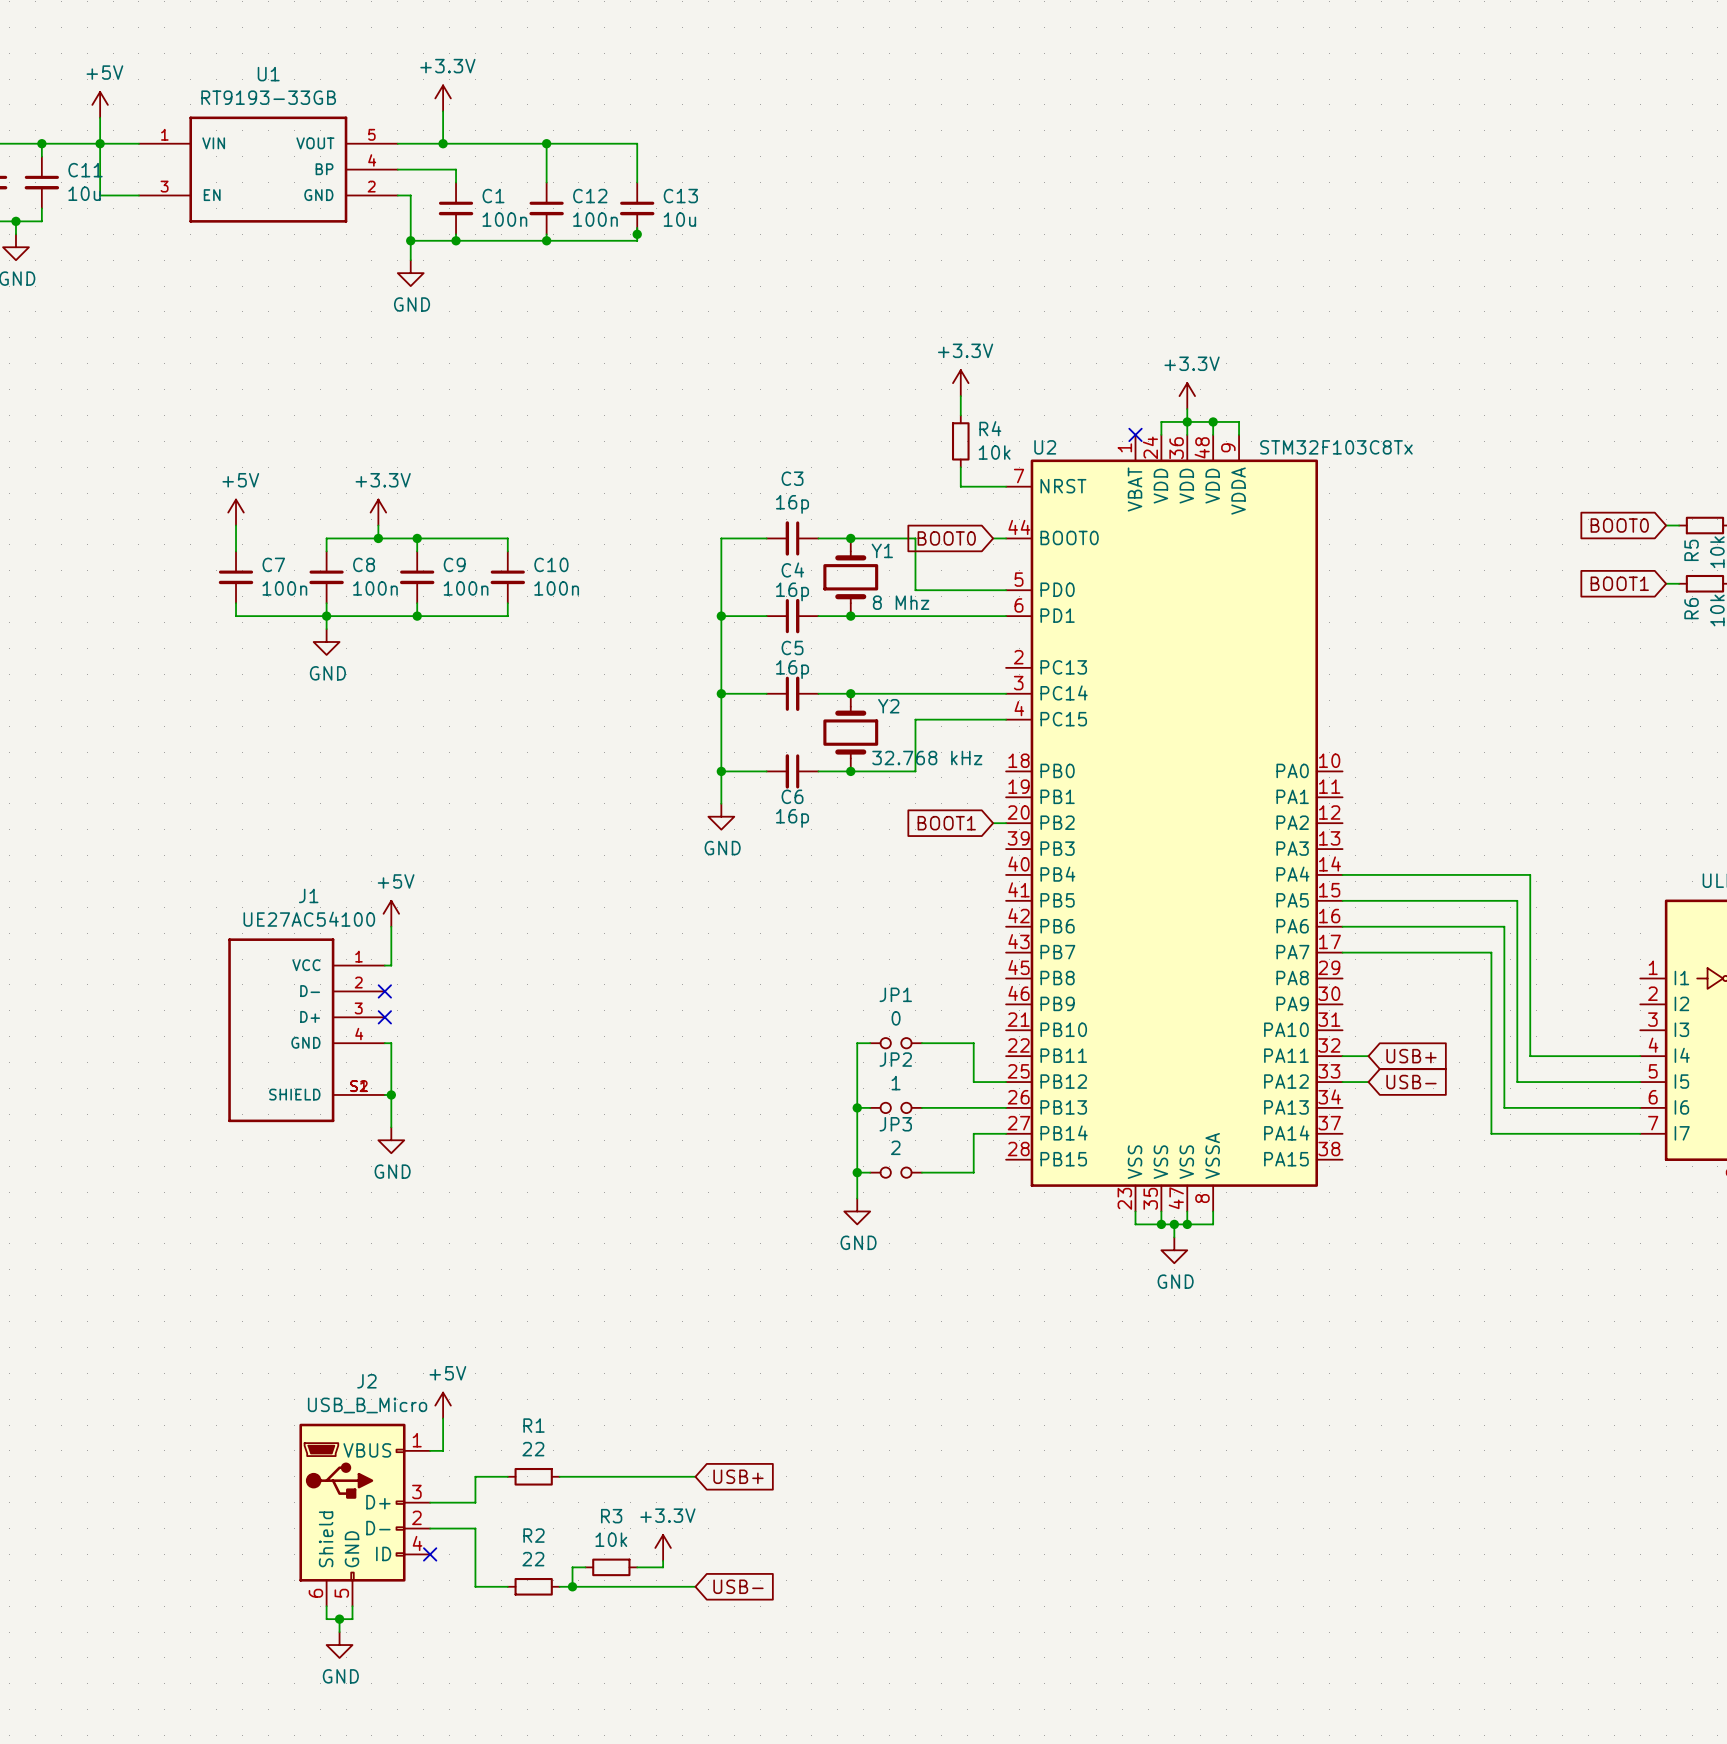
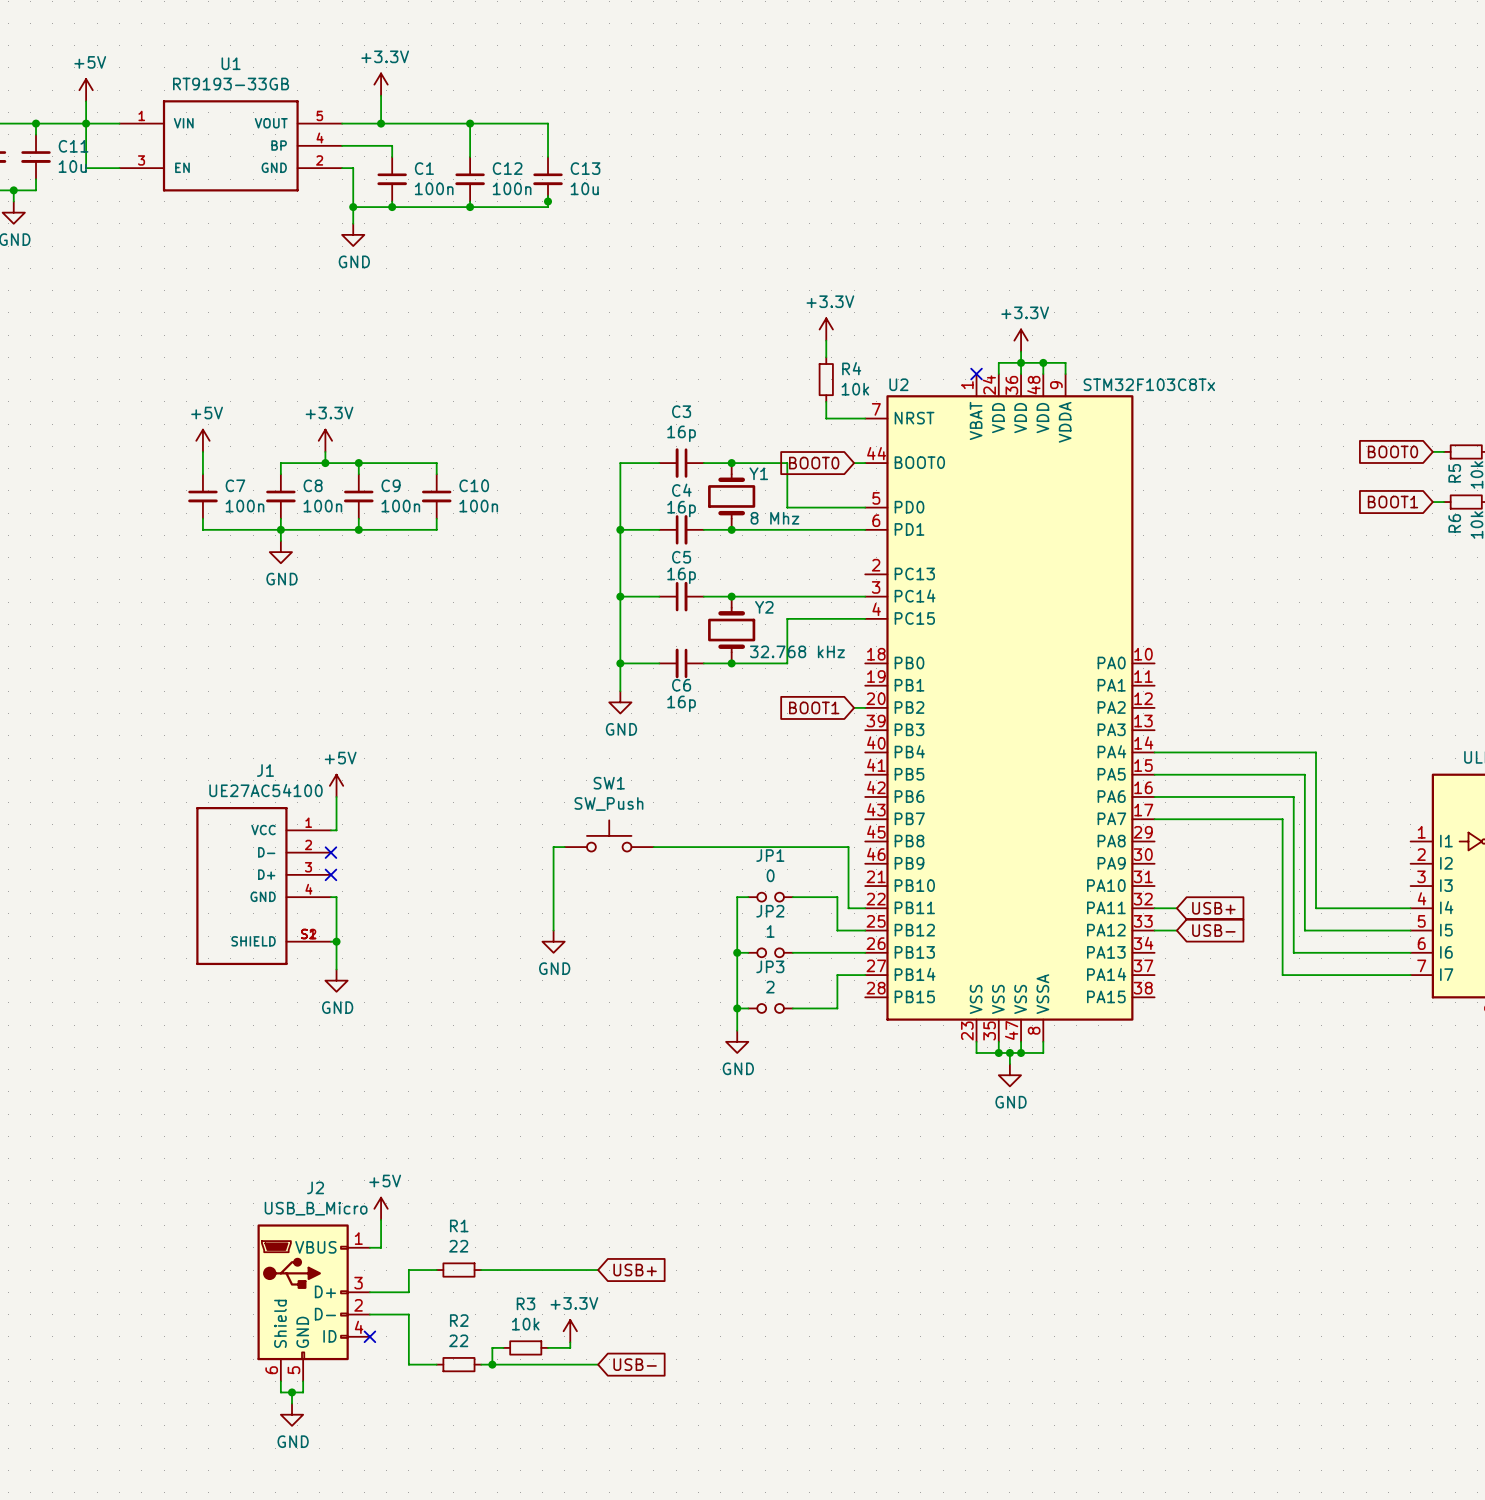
SW1: none -> SW_Push (609, 835)
wire: none -> (564, 847) (553, 847) (553, 930)
wire: none -> (653, 847) (848, 847) (848, 908) (865, 908)
power symbol: none -> GND (553, 941)

